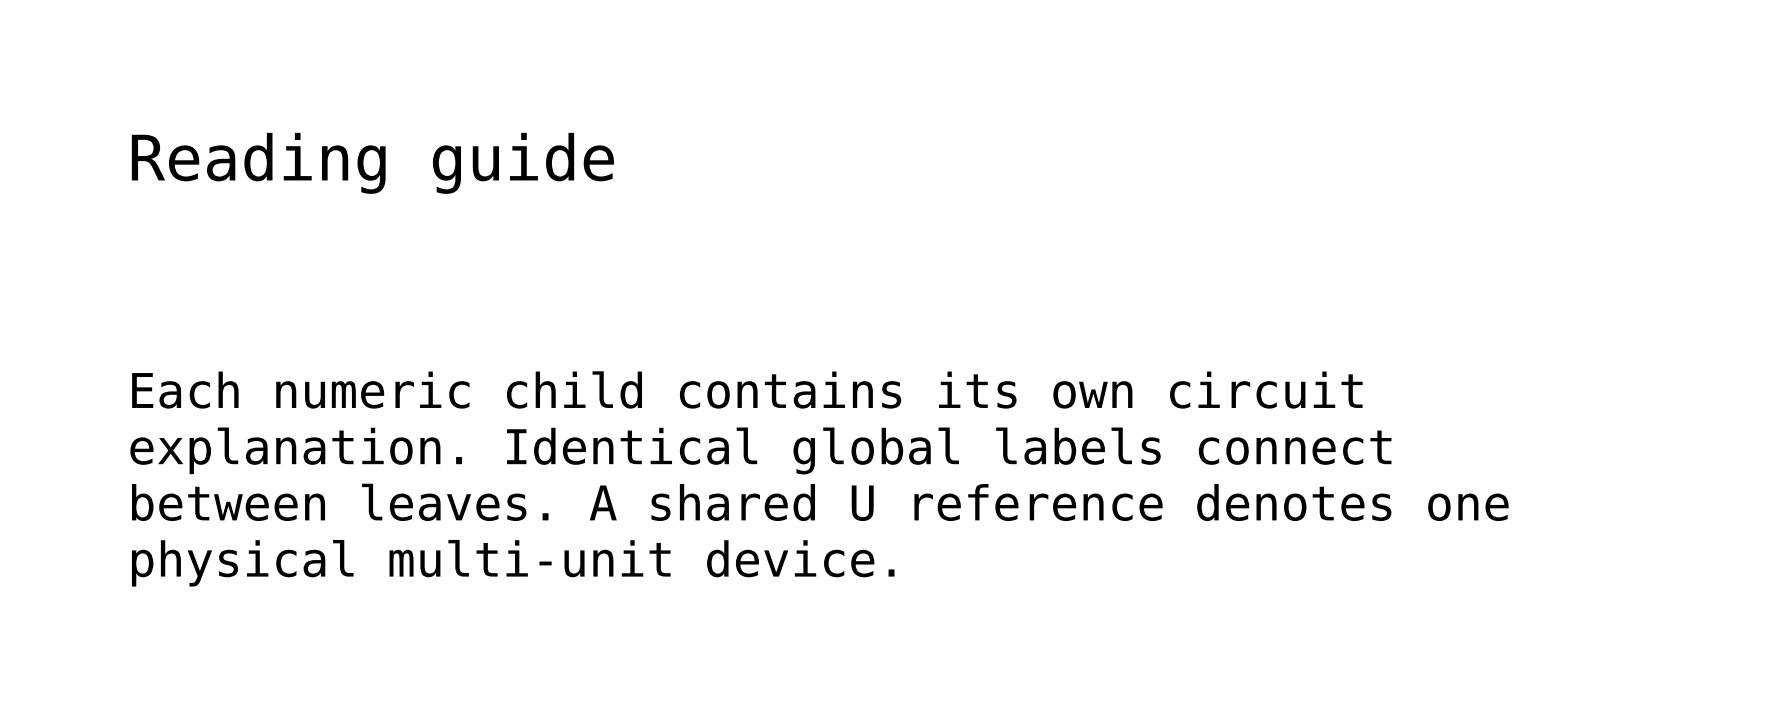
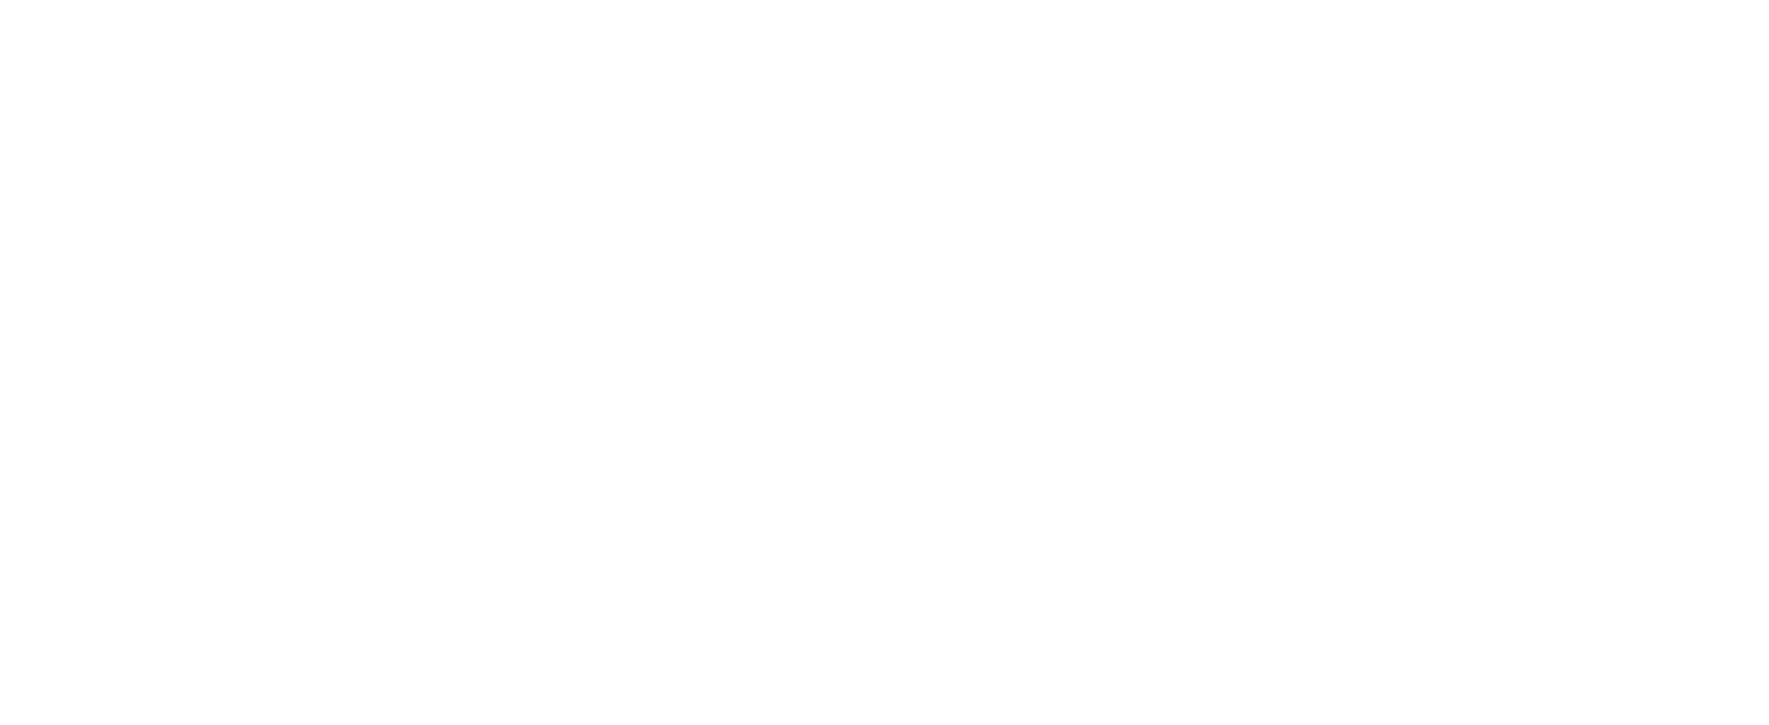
text: Reading guide (372, 163) -> none
text: Each numeric child contains its own circuit (747, 389) -> none
text: explanation. Identical global labels connect (760, 450) -> none
text: between leaves. A shared U reference denotes one (820, 502) -> none
text: physical multi-unit device. (513, 563) -> none

